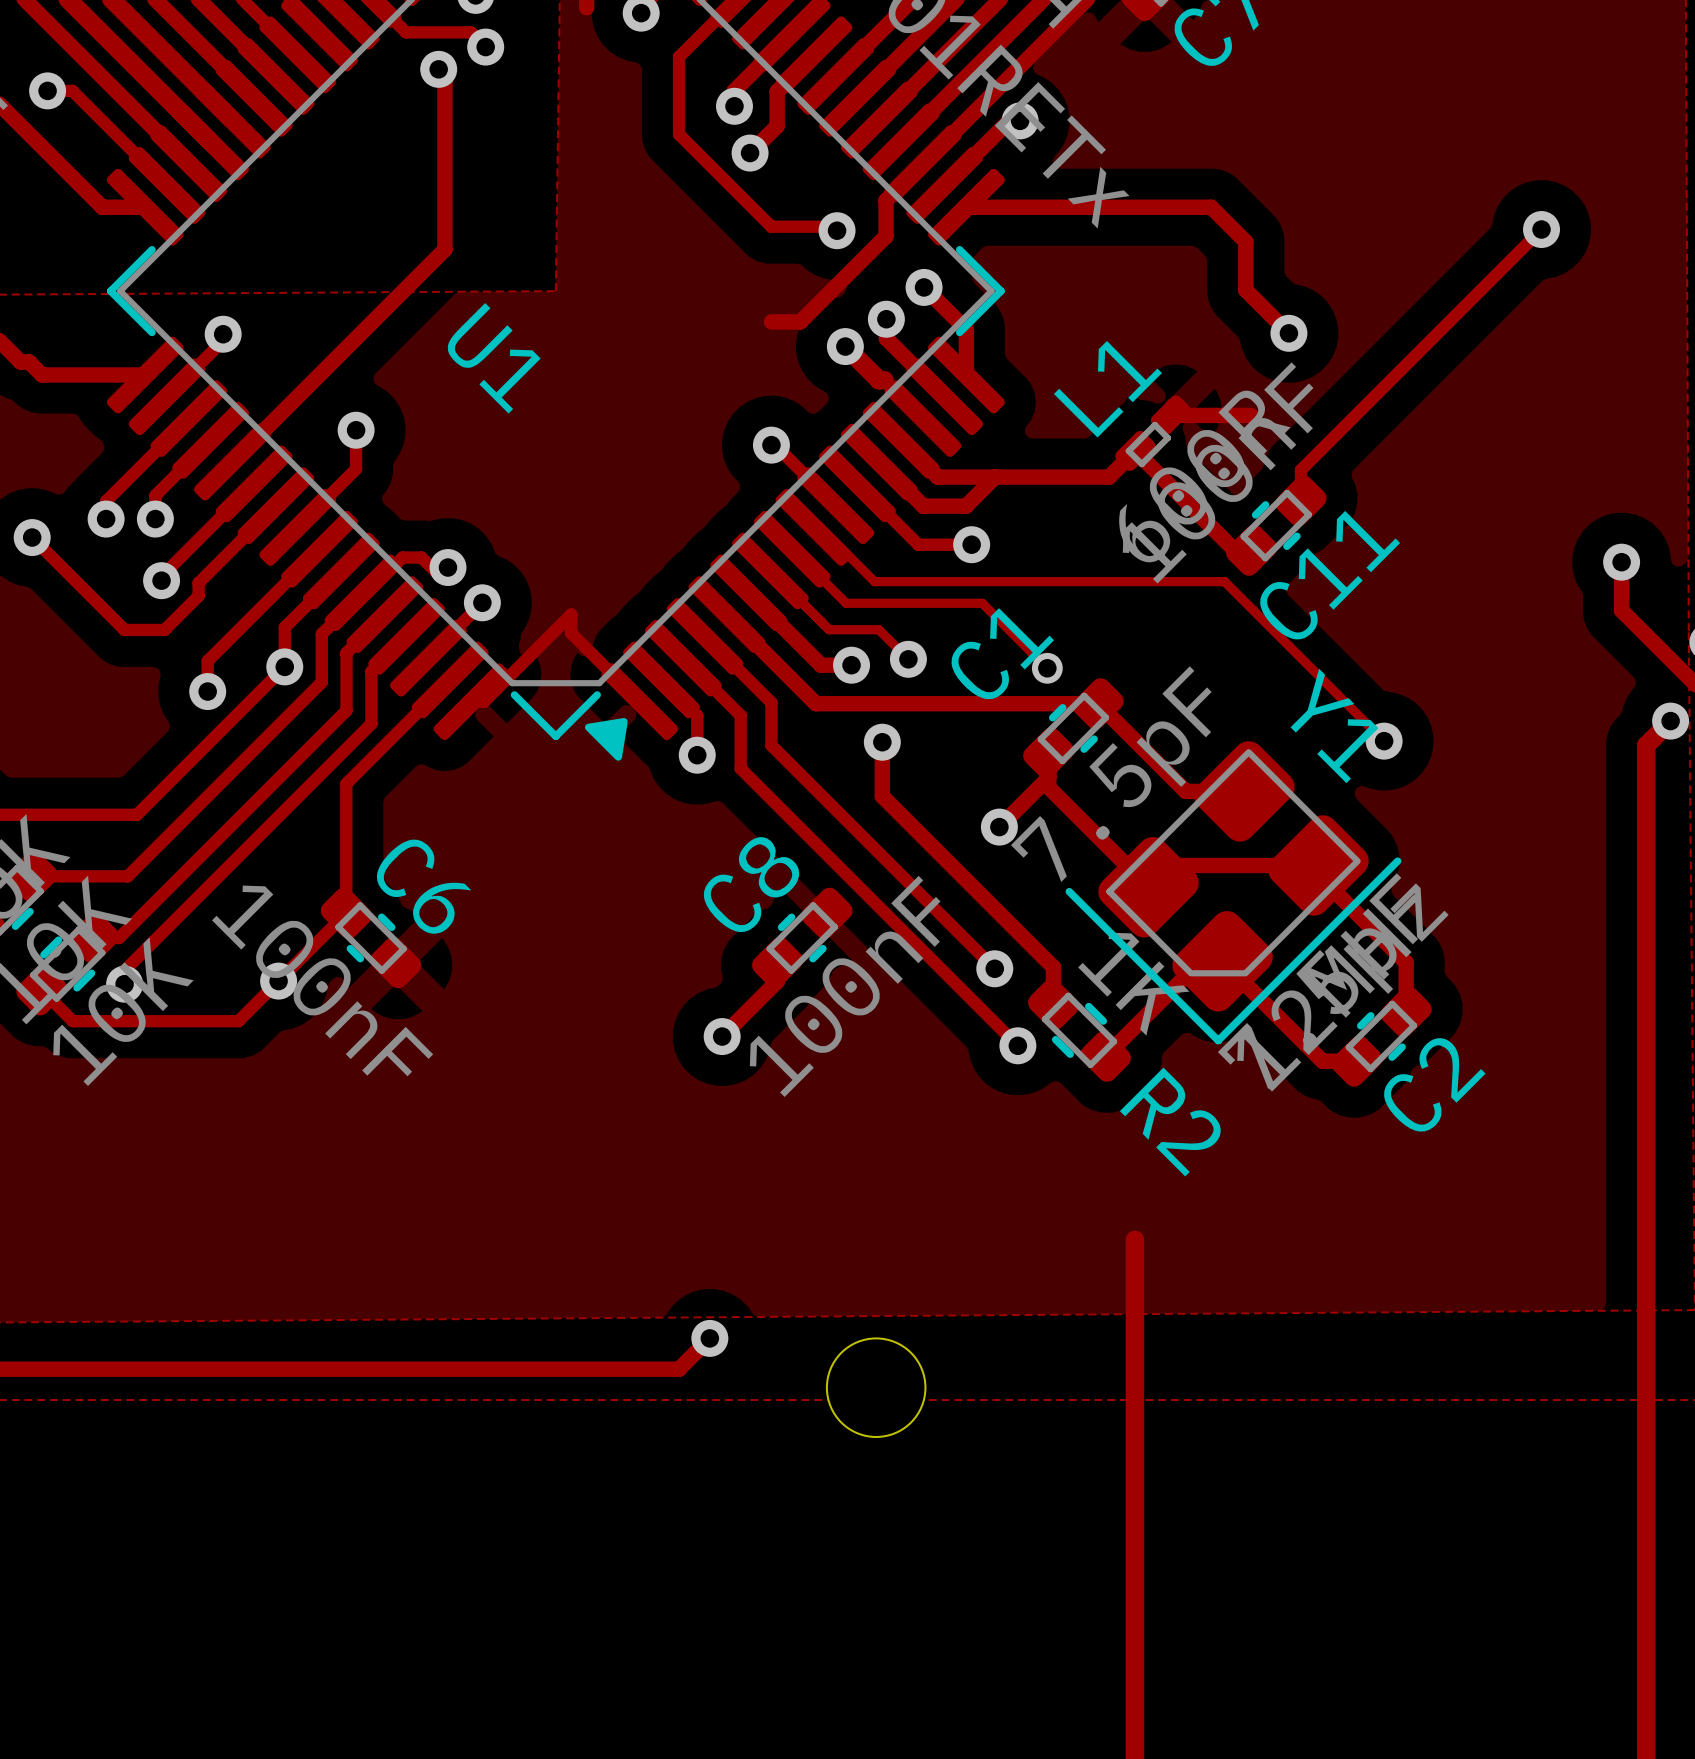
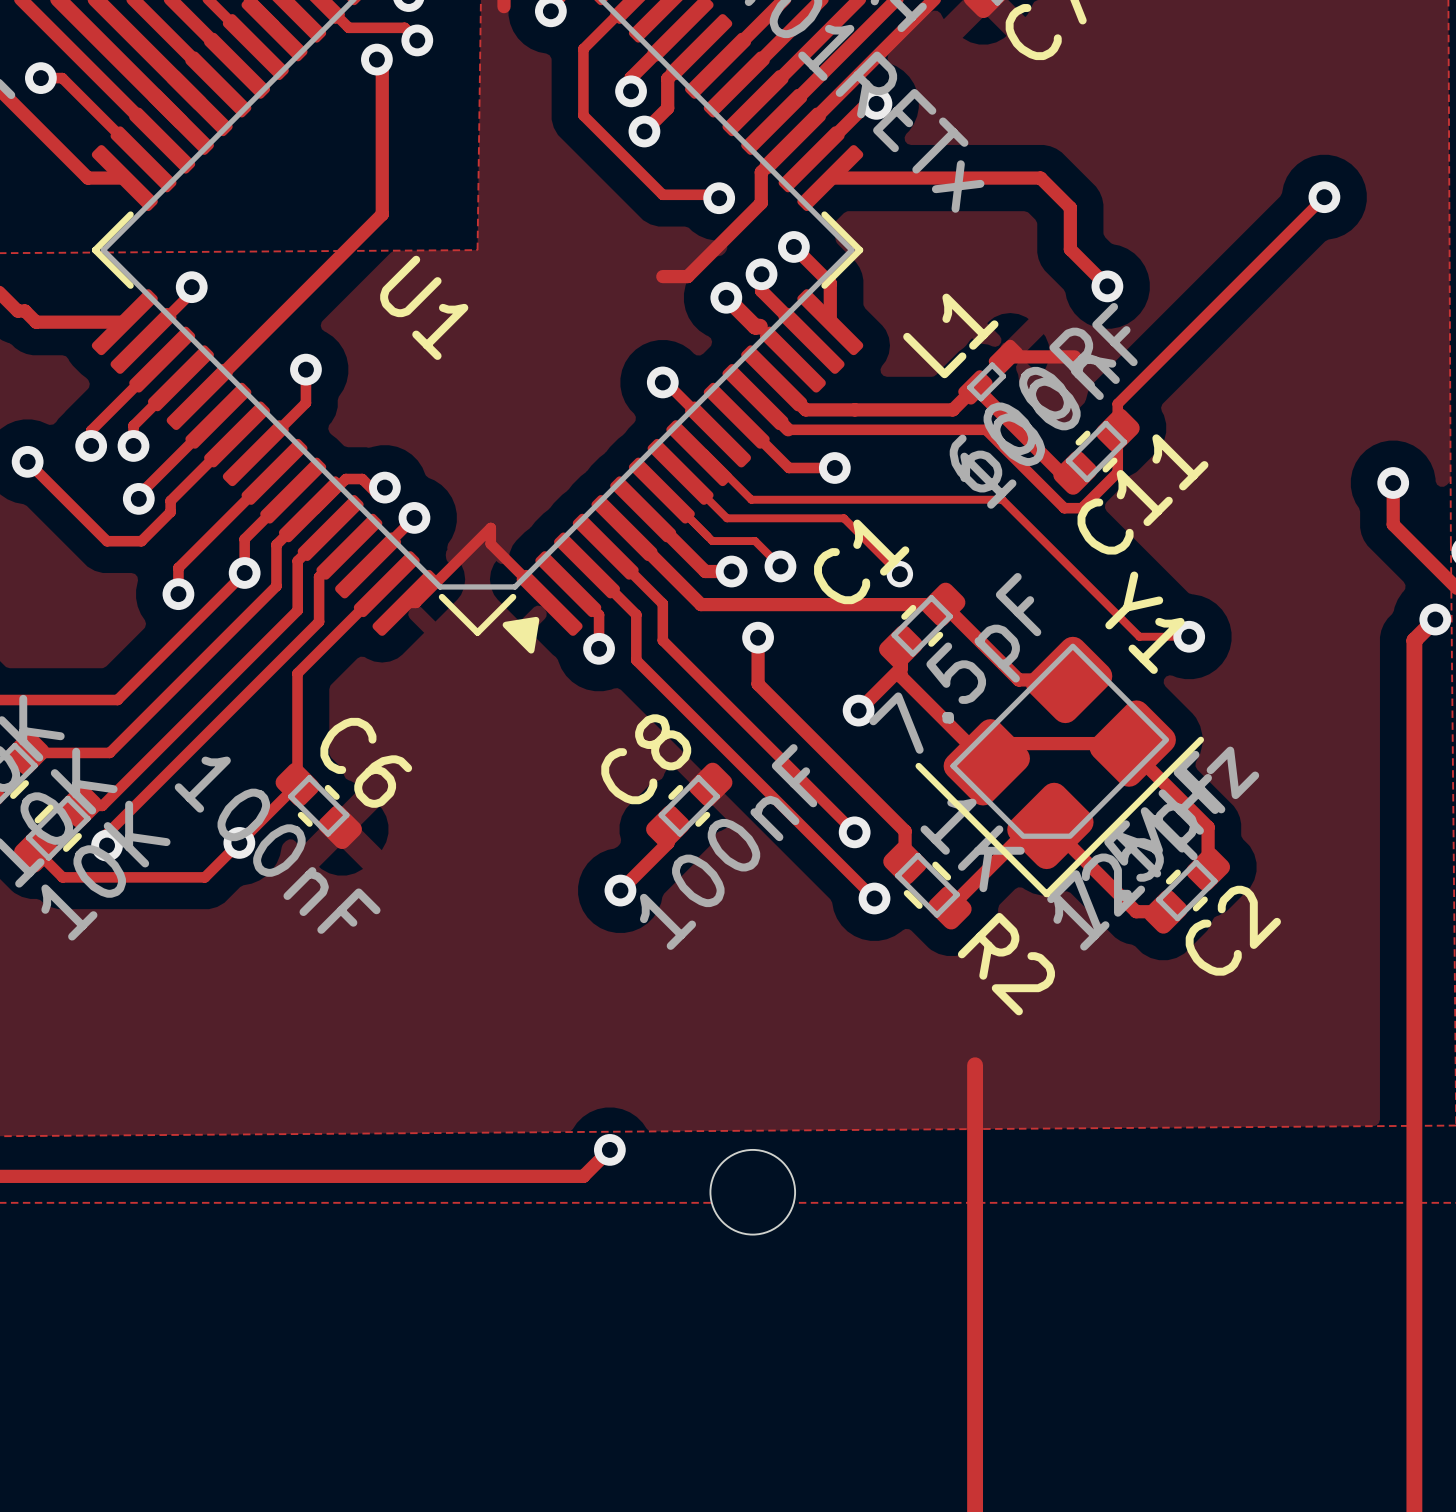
track: (995, 477) (966, 506) (923, 506) (917, 500) -> (1117, 430) (1117, 472) (1081, 508) (1064, 508) (985, 429) (788, 429)
track: (1166, 581) (1224, 581) (1384, 741) -> (1002, 499) (1139, 636) (1189, 636)

